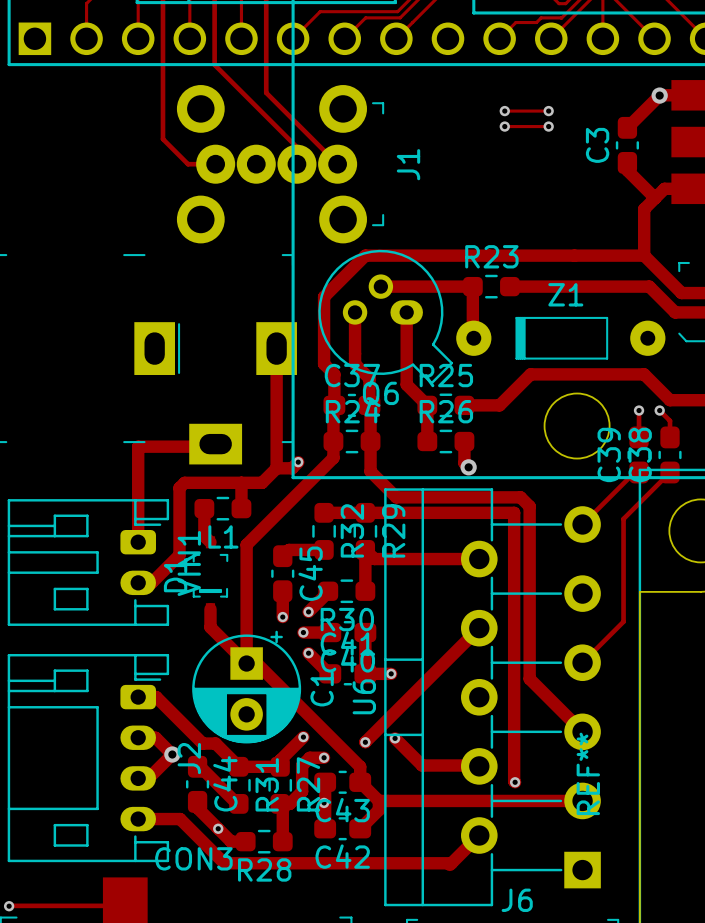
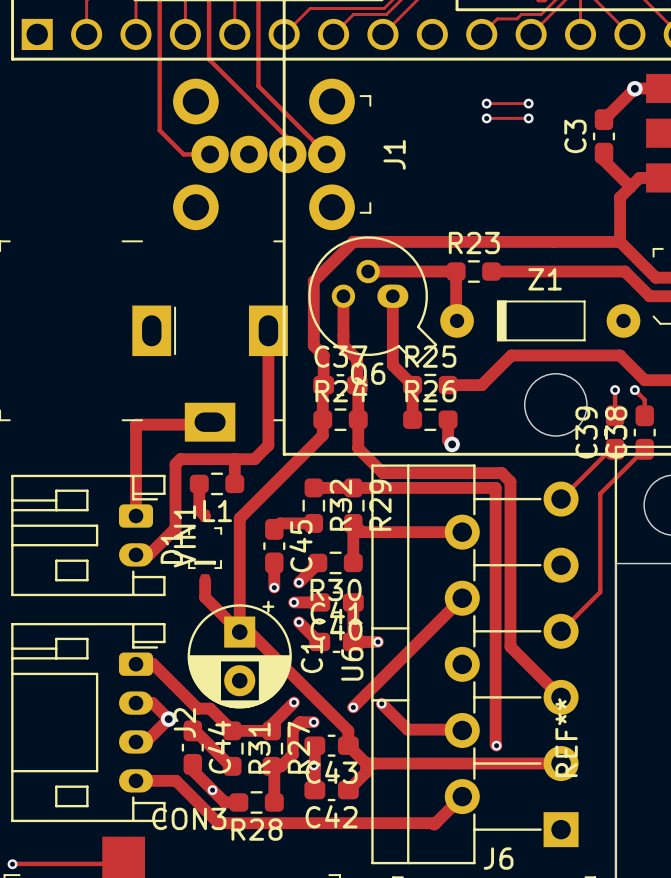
track: (298, 462) (292, 468) (276, 468) -> none
via: (298, 462) -> none

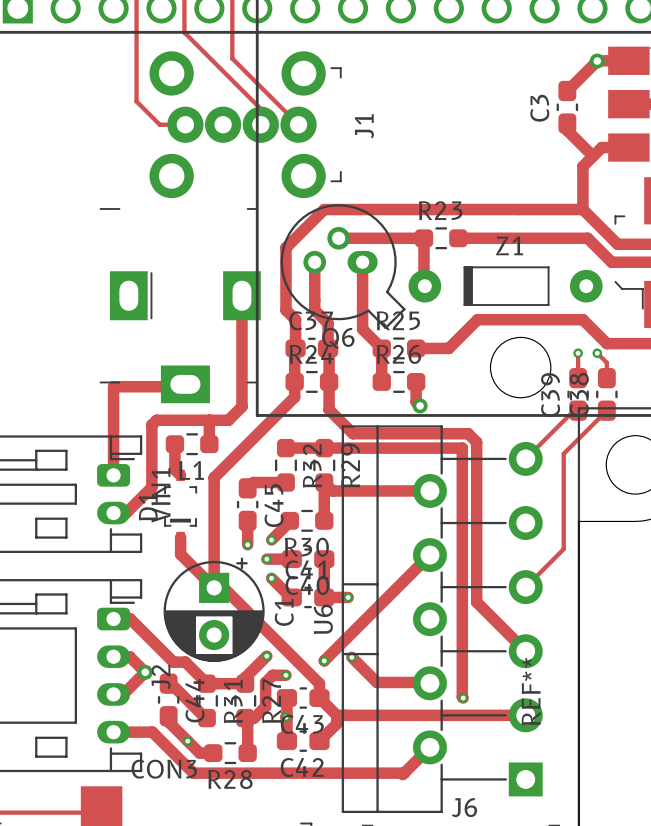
track: (486, 103) (528, 103) -> none
via: (486, 103) -> none
via: (528, 103) -> none
track: (486, 118) (528, 118) -> none
via: (486, 118) -> none
via: (528, 118) -> none

